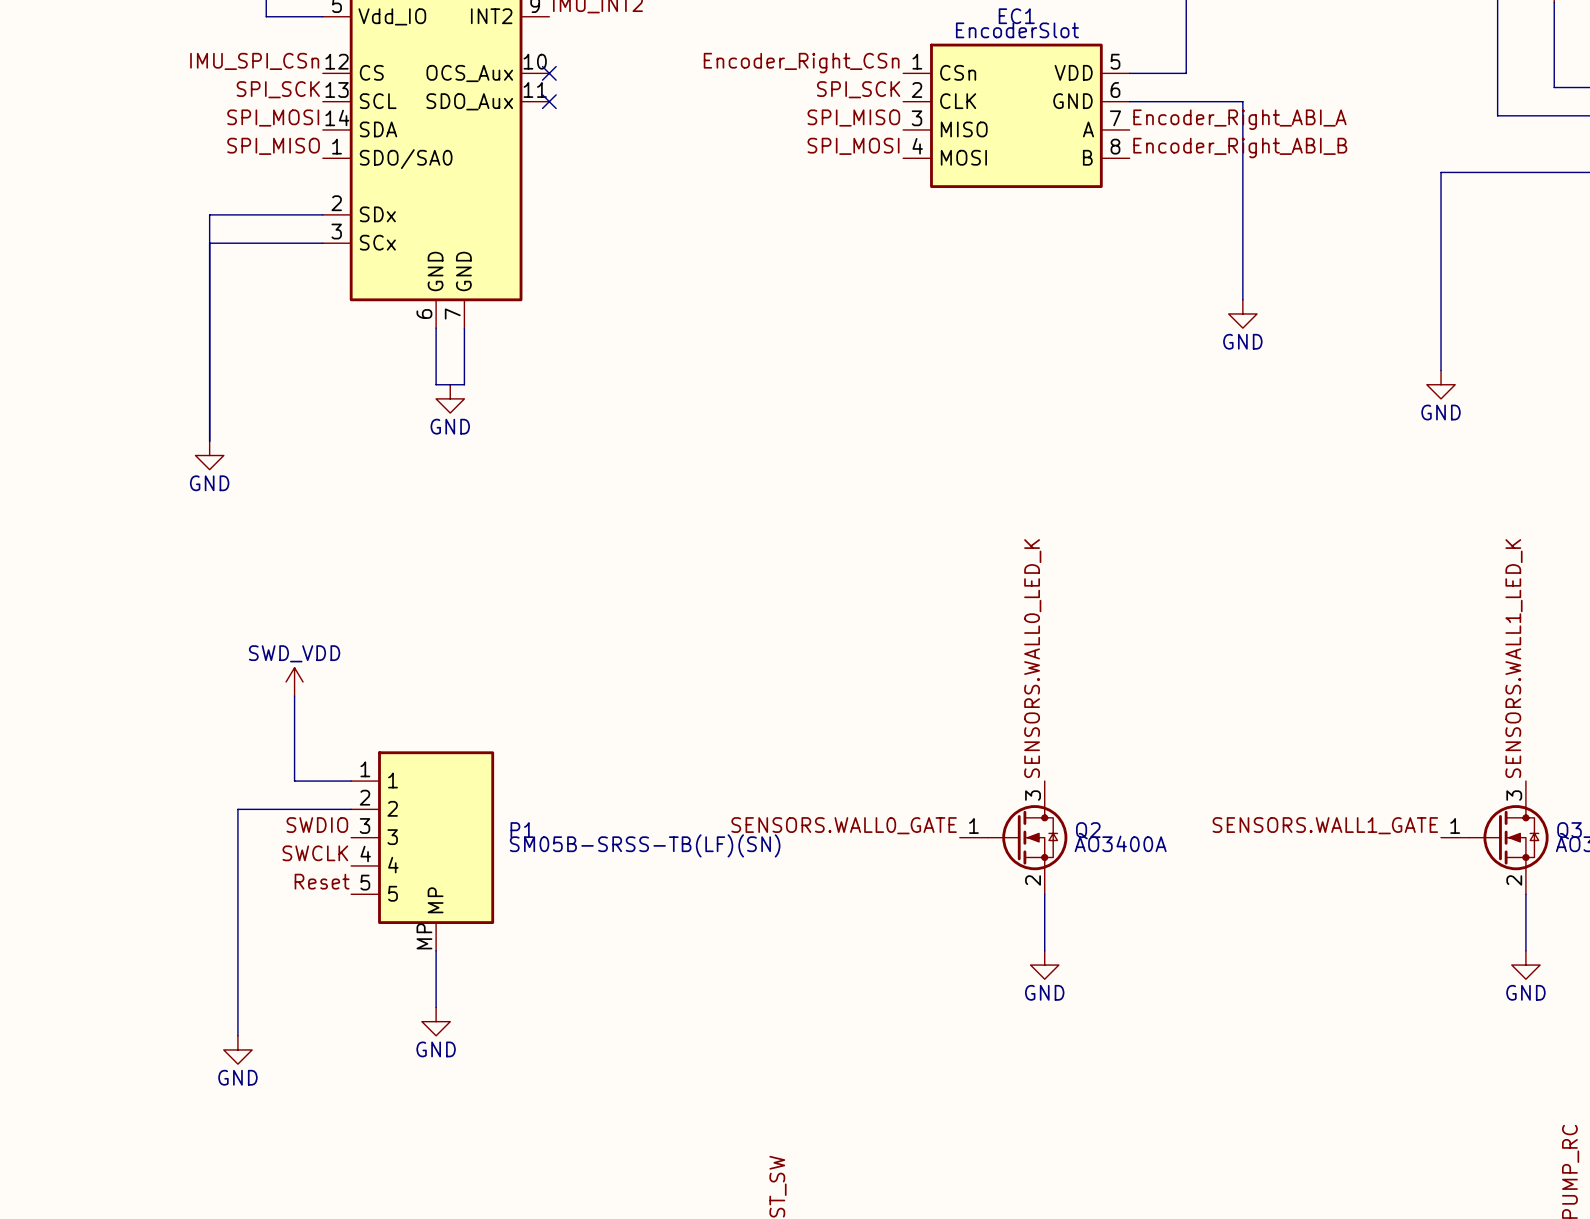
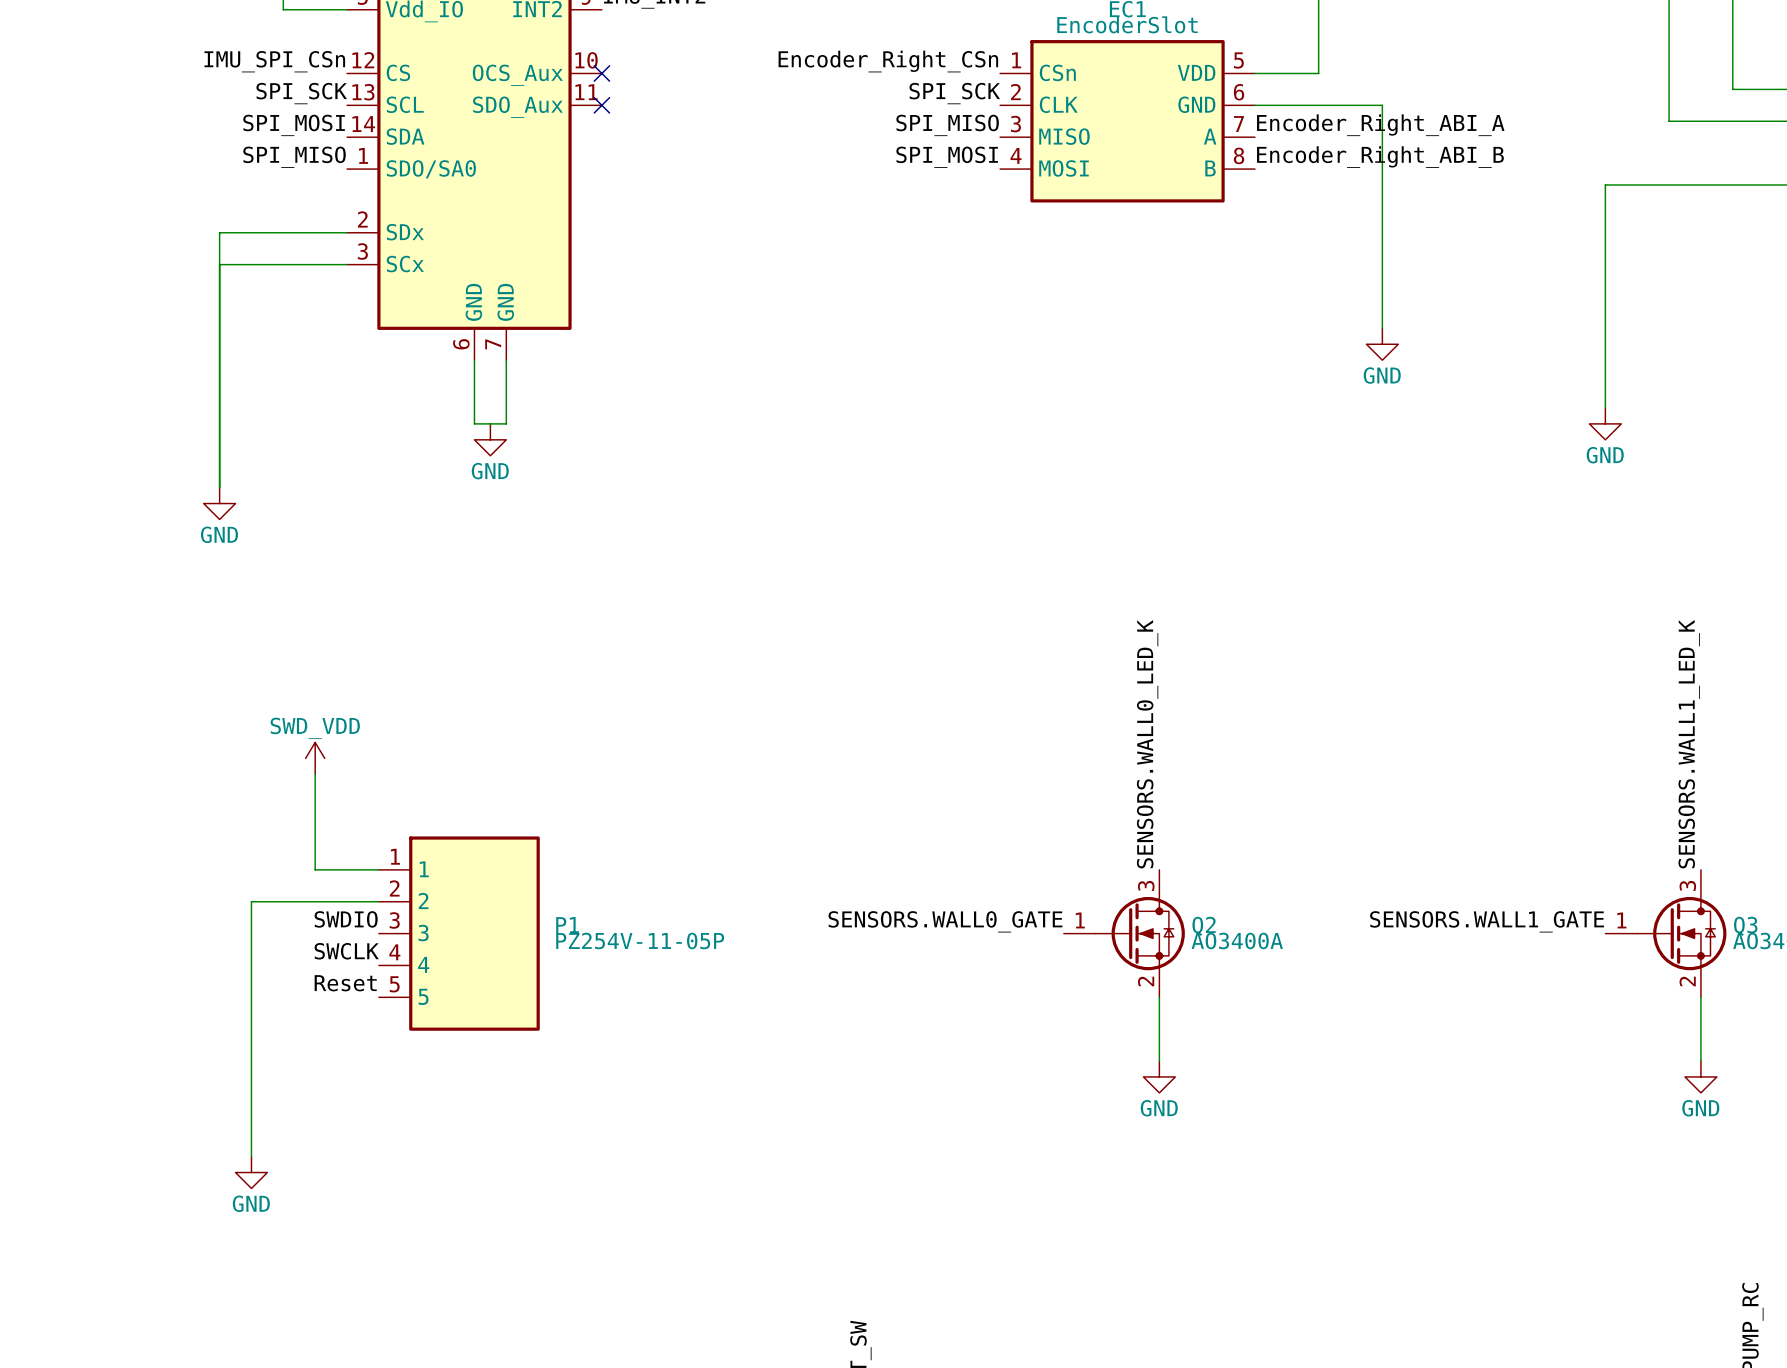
P1 symbol: [351, 751, 495, 951] -> [378, 836, 540, 1031]
P1 value: SM05B-SRSS-TB(LF)(SN) (645, 845) -> PZ254V-11-05P (640, 940)
wire: (436, 950) (436, 1007) -> none
power symbol: GND (436, 1021) -> none

